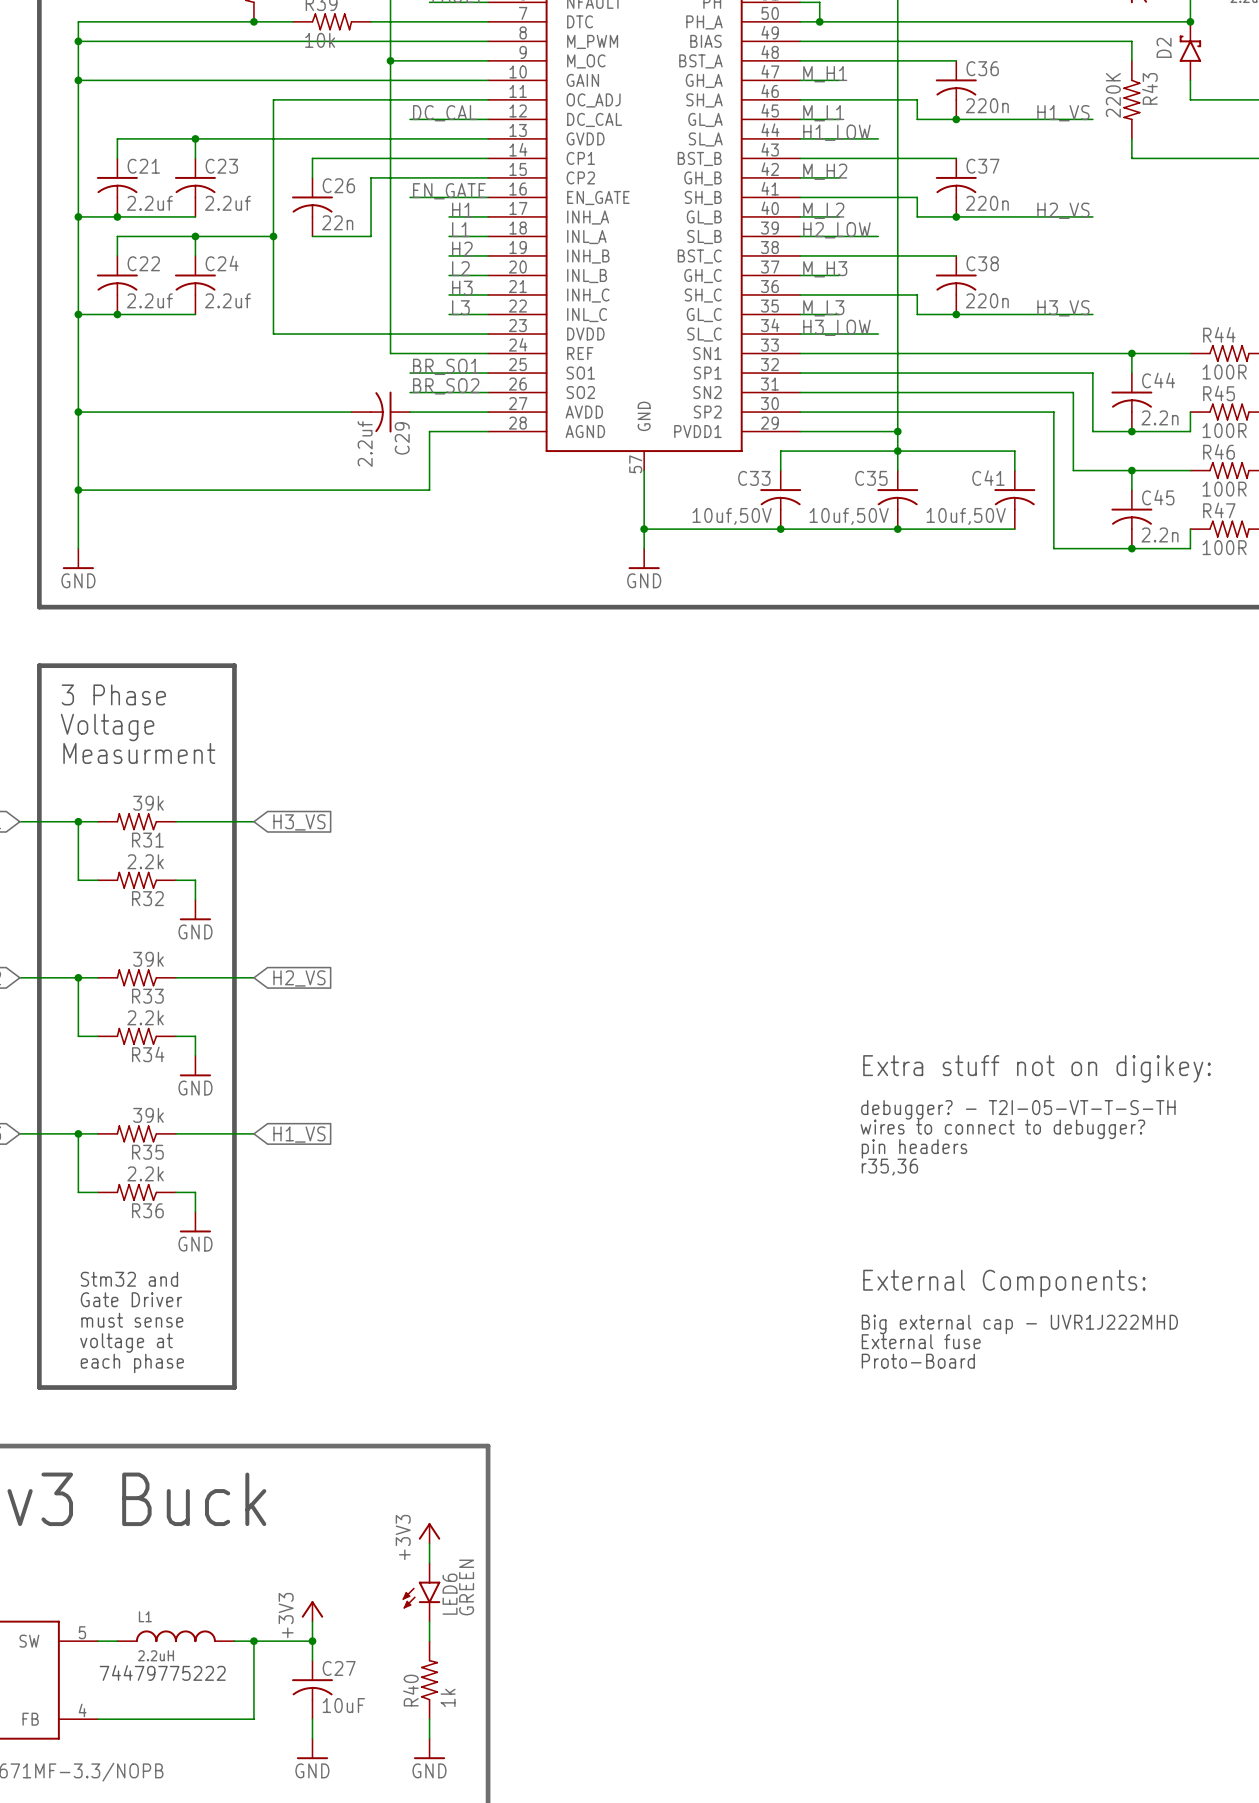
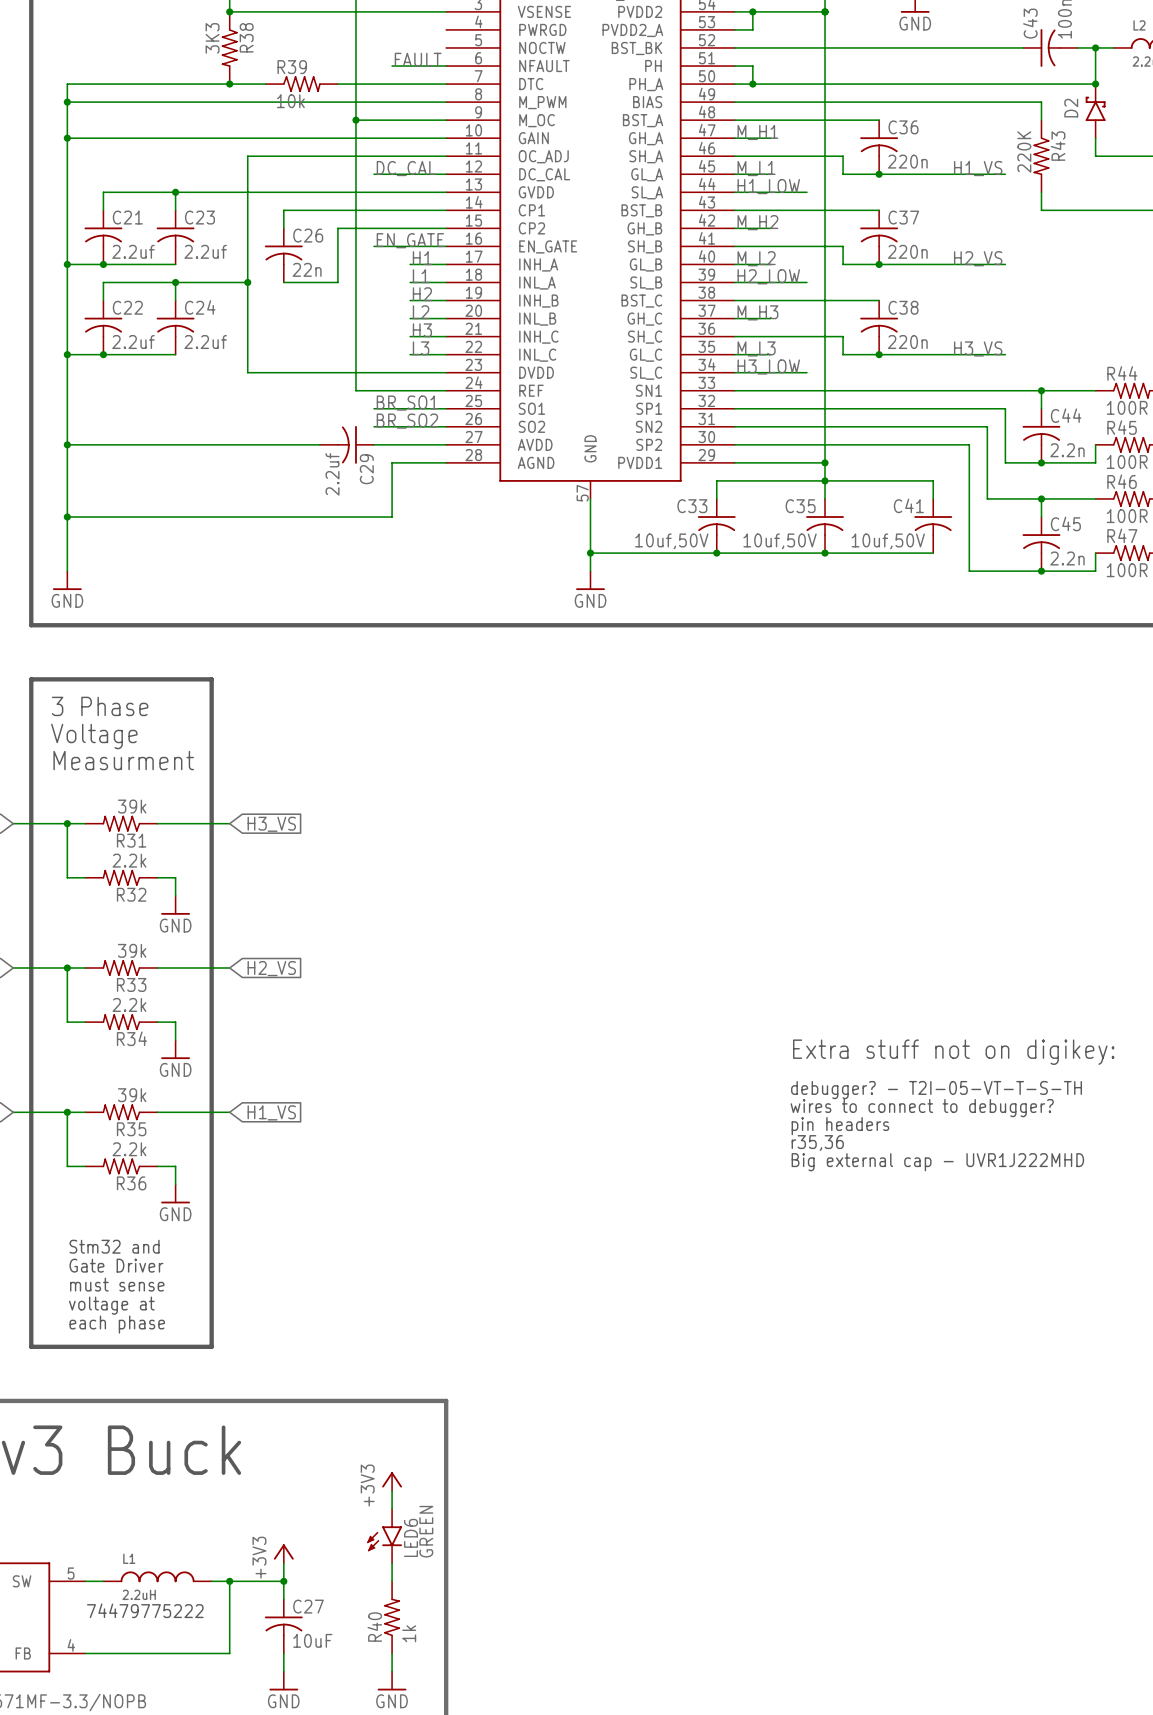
text: External Components: (1004, 1283) -> none
text position: Big external cap - UVR1J222MHD (1019, 1324) -> Big external cap - UVR1J222MHD (937, 1162)
text: External fuse (921, 1341) -> none
text: Proto-Board (918, 1361) -> none

